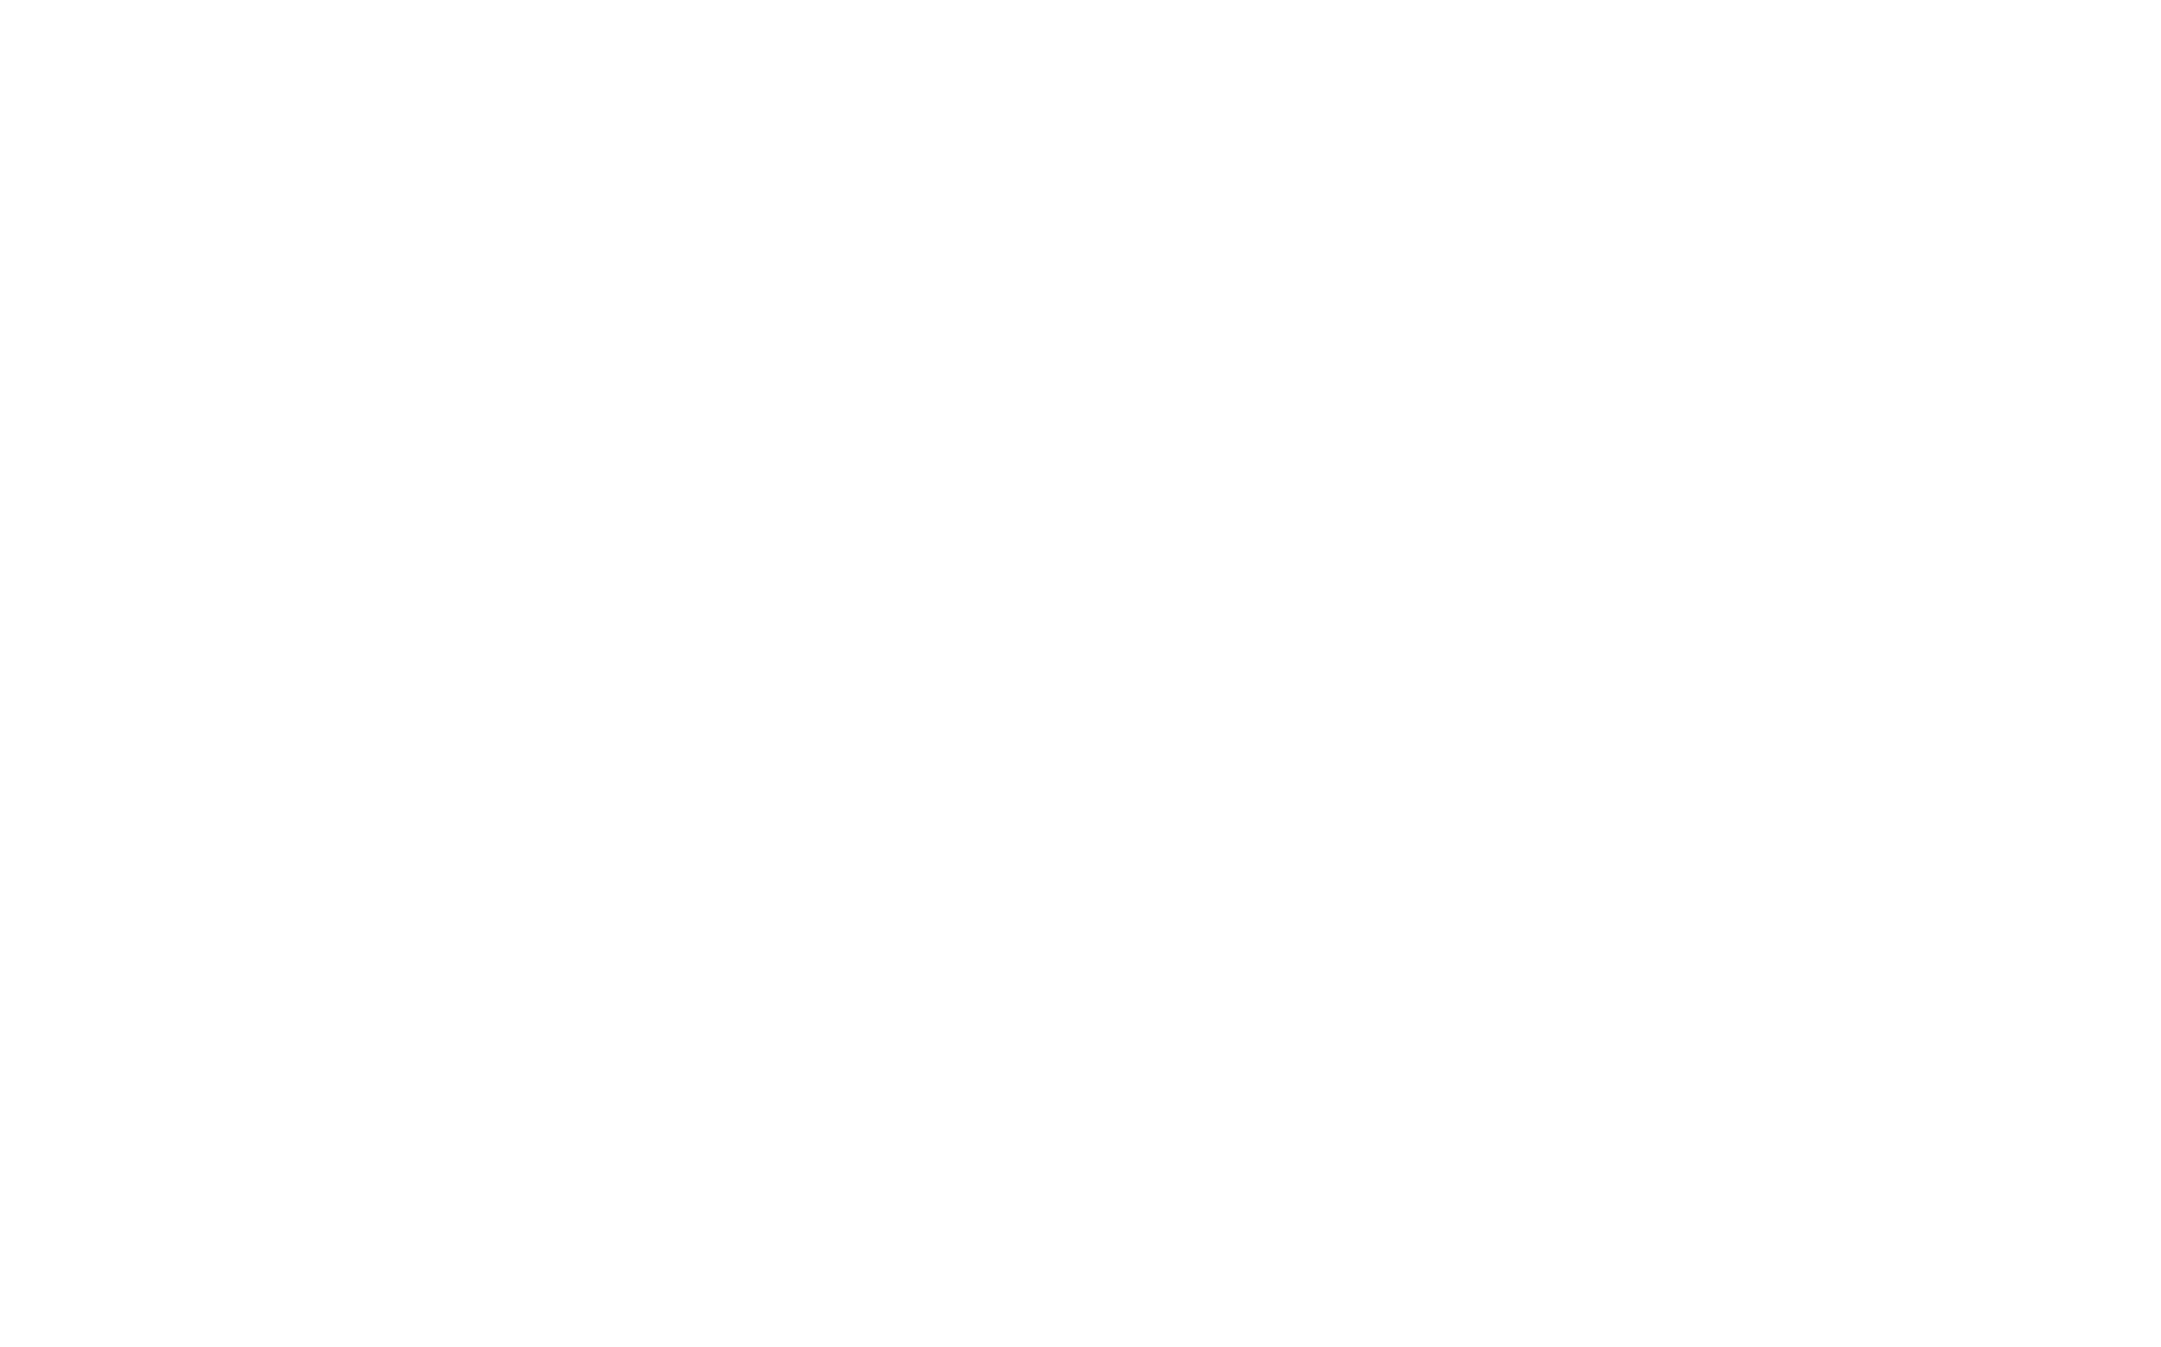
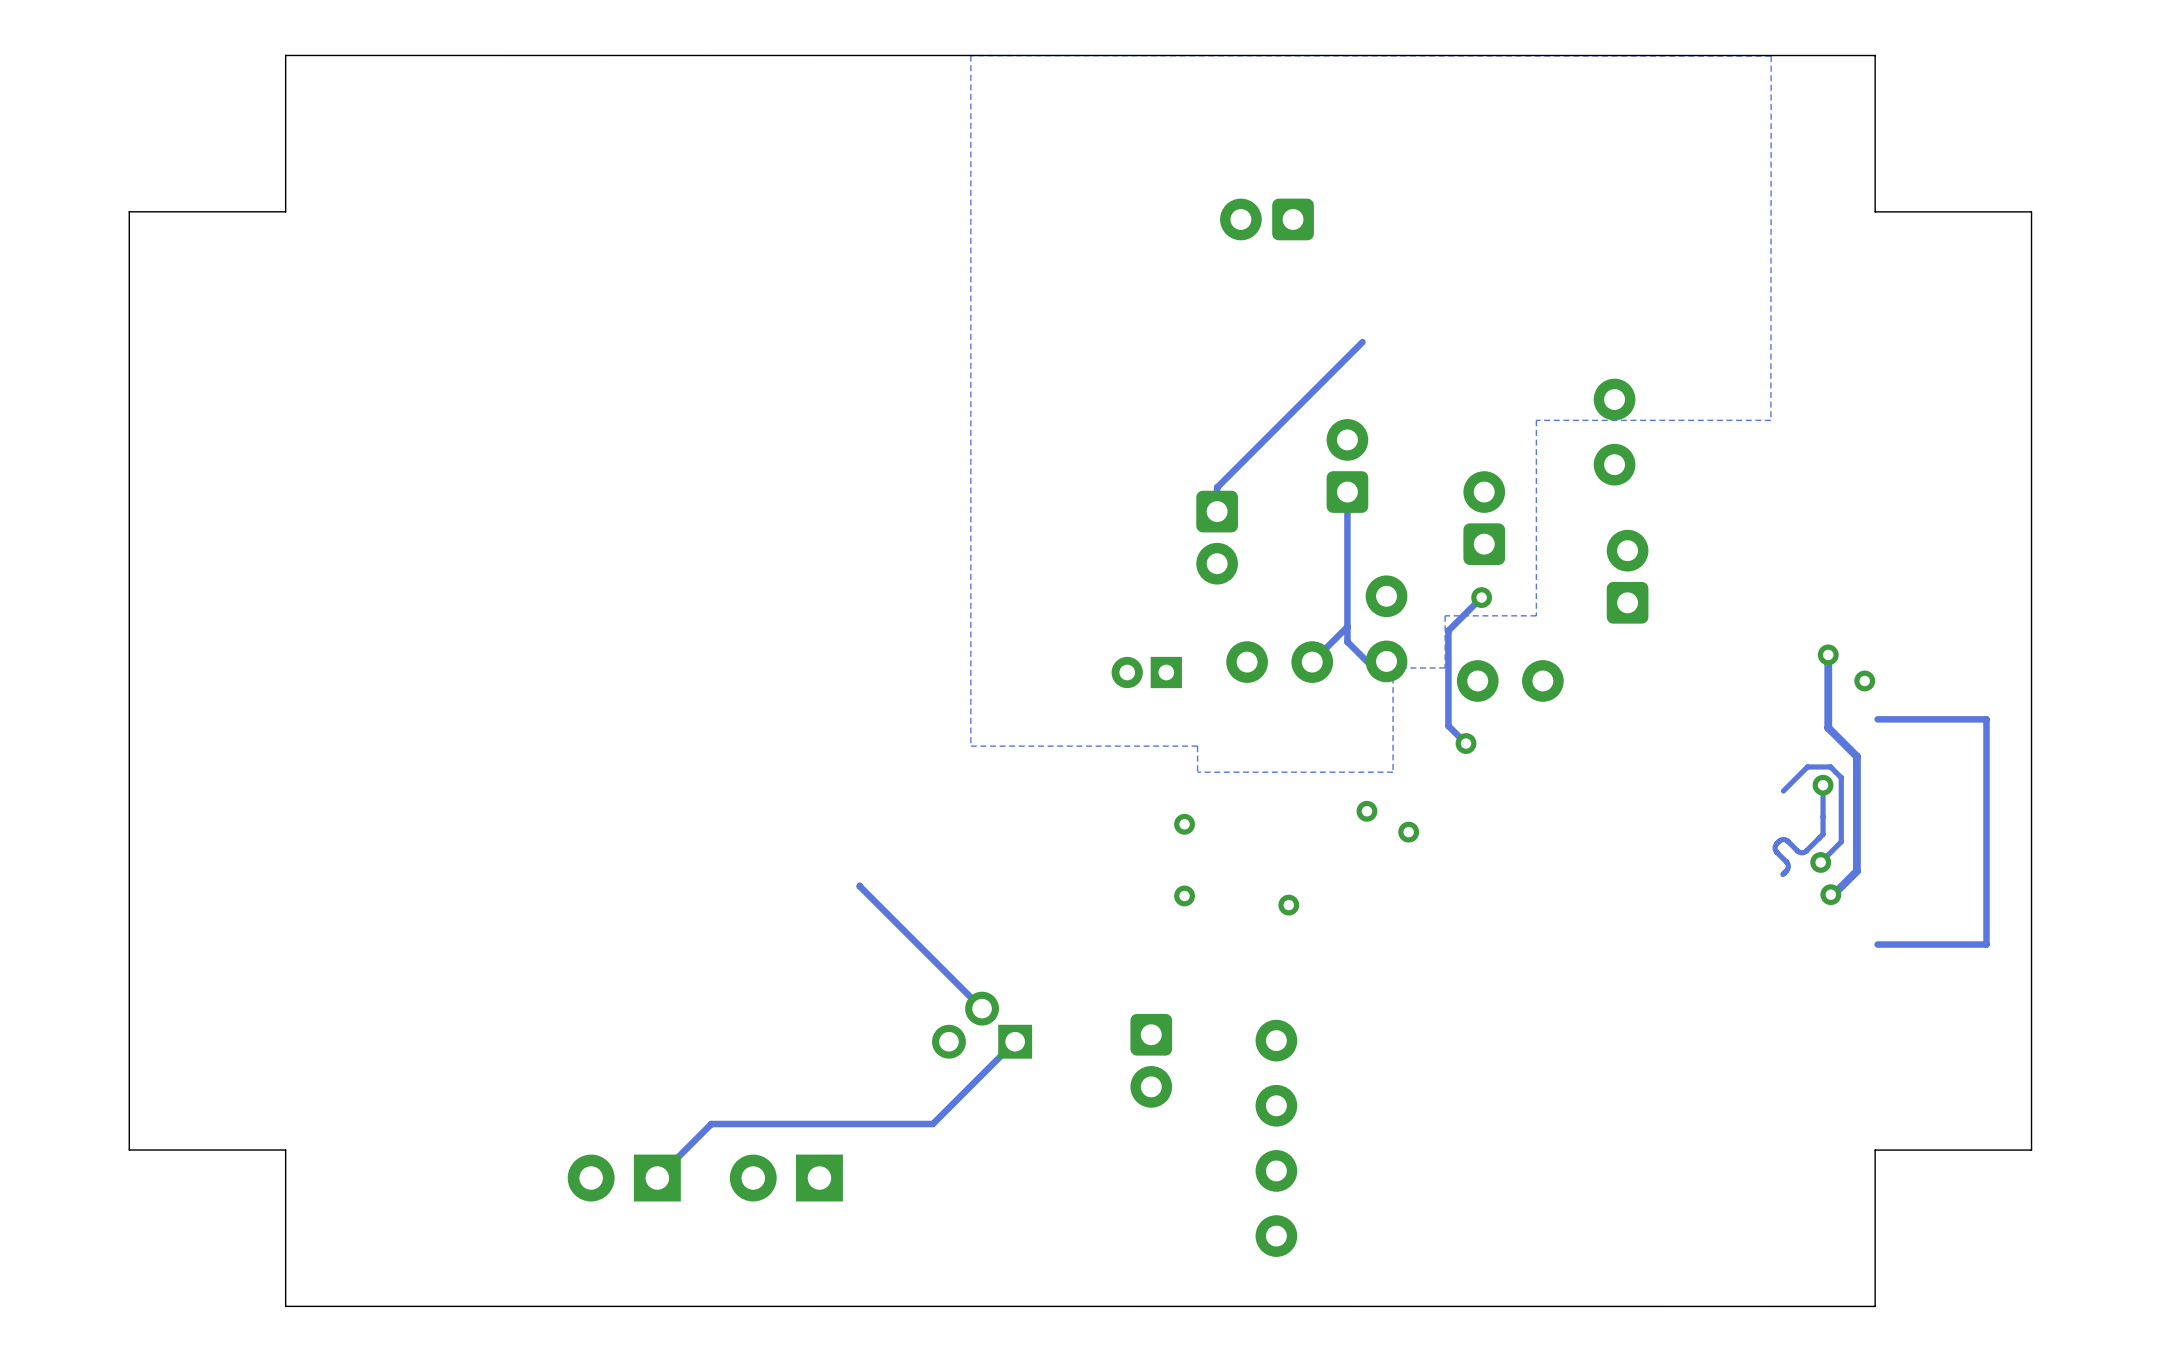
zone outline: none -> (970, 55) (1771, 56) (1770, 420) (1536, 420) (1536, 615) (1445, 615) (1445, 667) (1393, 667) (1393, 772) (1197, 772) (1197, 746) (970, 746) (970, 55)
board edge: none -> (1875, 55) (285, 55) (285, 211) (129, 211) (129, 1150) (285, 1150) (285, 1306) (1875, 1306) (1875, 1150) (2031, 1150) (2031, 211) (1875, 211) (1875, 55)
part: none -> (1266, 219)
track: none -> (1362, 342) (1217, 487) (1217, 511)
part: none -> (1614, 432)
part: none -> (1347, 465)
track: none -> (1347, 492) (1347, 641) (1380, 674)
part: none -> (1484, 518)
part: none -> (1217, 537)
part: none -> (1627, 576)
track: none -> (1481, 597) (1448, 630) (1448, 725) (1466, 743)
via: none -> (1481, 597)
track: none -> (1347, 626) (1312, 662)
part: none -> (1386, 628)
track: none -> (1828, 654) (1828, 727) (1856, 756) (1856, 871) (1833, 894) (1830, 894)
via: none -> (1828, 654)
part: none -> (1279, 662)
part: none -> (1146, 672)
part: none -> (1510, 680)
via: none -> (1864, 680)
track: none -> (1877, 719) (1986, 719) (1986, 944) (1877, 944)
via: none -> (1466, 743)
track: none -> (1823, 785) (1823, 834) (1802, 852) (1798, 851) (1785, 840) (1779, 841) (1775, 845) (1775, 850) (1788, 865) (1782, 874)
via: none -> (1823, 785)
track: none -> (1783, 791) (1807, 766) (1830, 766) (1841, 777) (1841, 841) (1820, 862)
via: none -> (1366, 811)
via: none -> (1184, 824)
via: none -> (1408, 832)
via: none -> (1820, 862)
track: none -> (859, 885) (982, 1008)
via: none -> (1830, 894)
via: none -> (1184, 895)
via: none -> (1288, 905)
part: none -> (982, 1025)
track: none -> (1015, 1041) (932, 1124) (711, 1124) (657, 1178)
part: none -> (1151, 1060)
part: none -> (1276, 1073)
part: none -> (624, 1178)
part: none -> (786, 1178)
part: none -> (1276, 1203)

